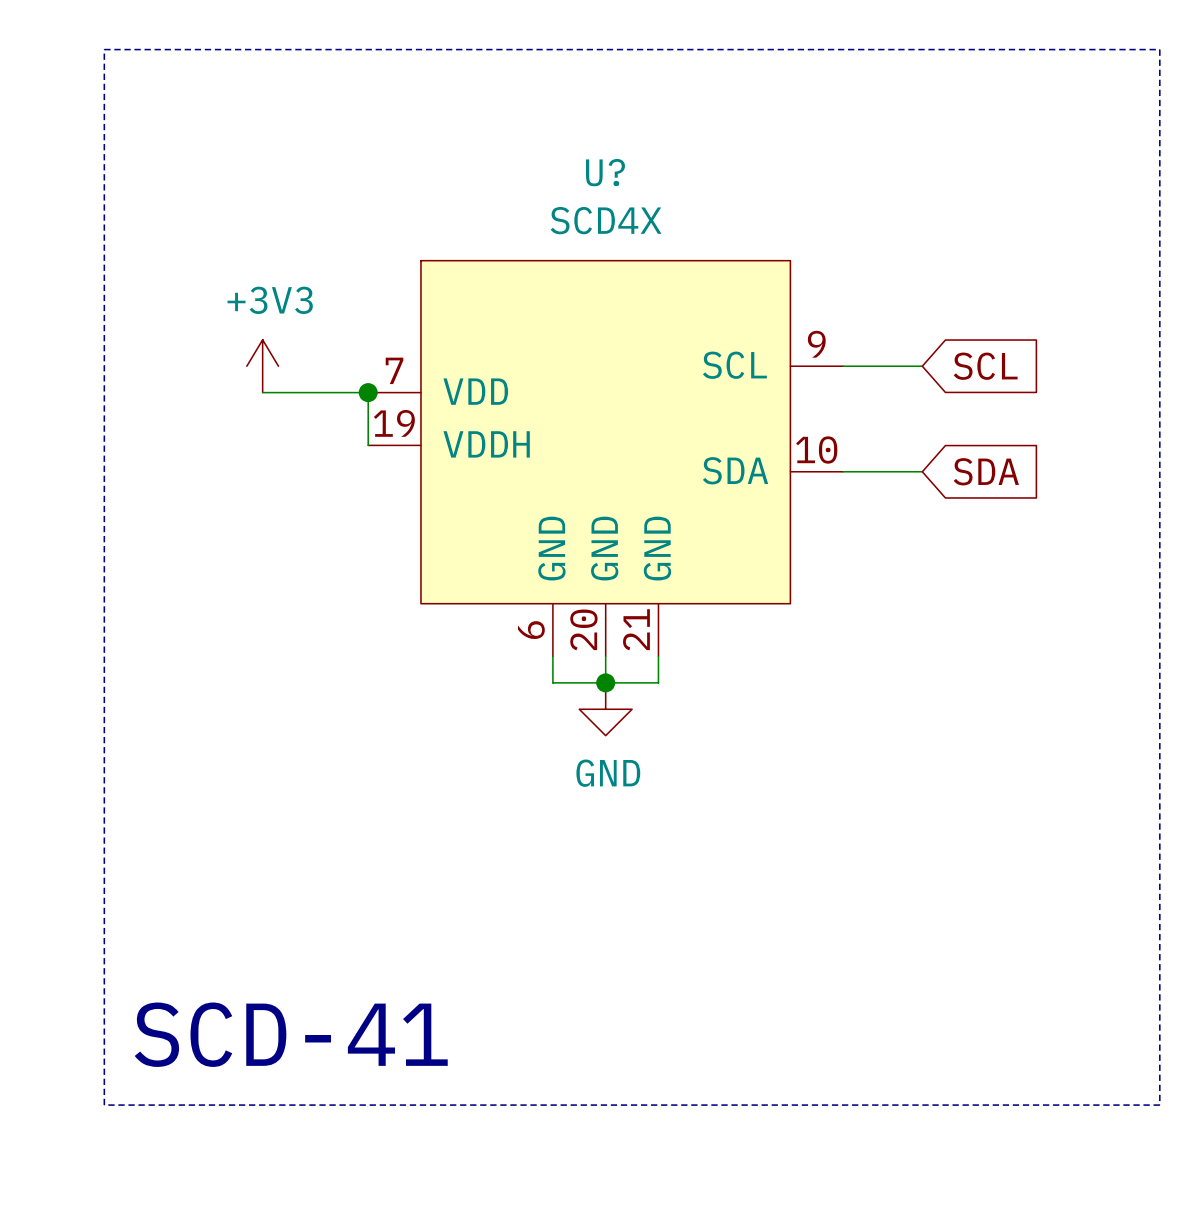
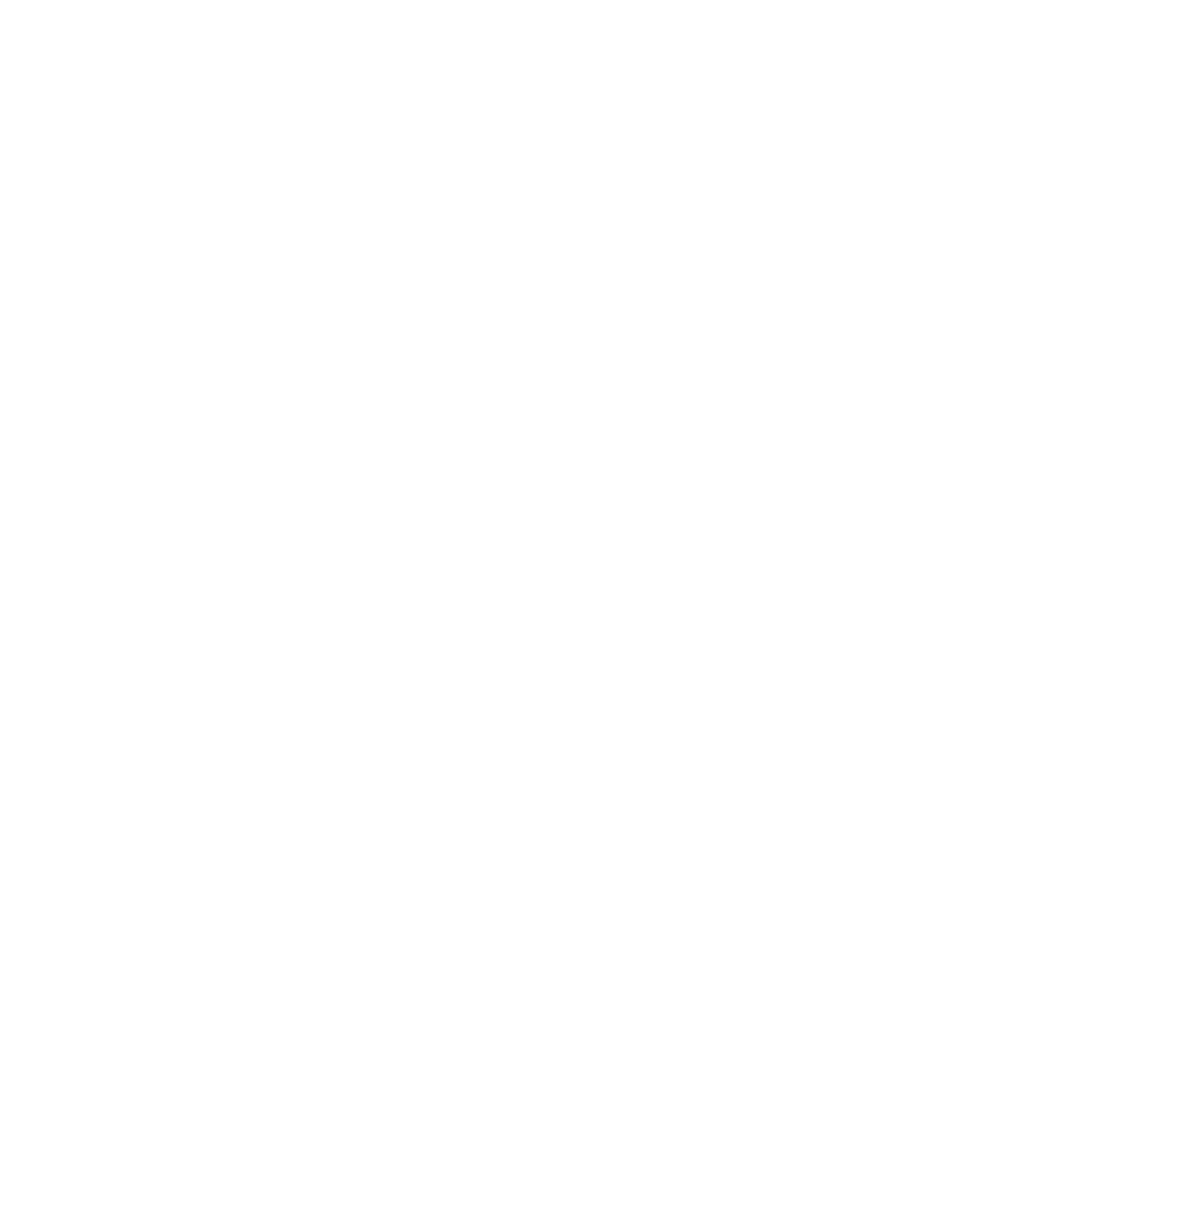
line: (104, 49) (1159, 49) (1159, 1105) (104, 1105) (104, 49) -> none
power symbol: +3V3 (262, 366) -> none
wire: (843, 366) (922, 366) -> none
global label: SCL (985, 366) -> none
wire: (262, 392) (368, 392) (368, 445) -> none
junction: (368, 392) -> none
U?: SCD4X (605, 458) -> none
wire: (843, 471) (922, 471) -> none
global label: SDA (986, 471) -> none
wire: (552, 656) (552, 682) (658, 682) (658, 656) -> none
wire: (605, 656) (605, 682) -> none
junction: (605, 682) -> none
power symbol: GND (605, 709) -> none
text: SCD-41 (291, 1034) -> none

